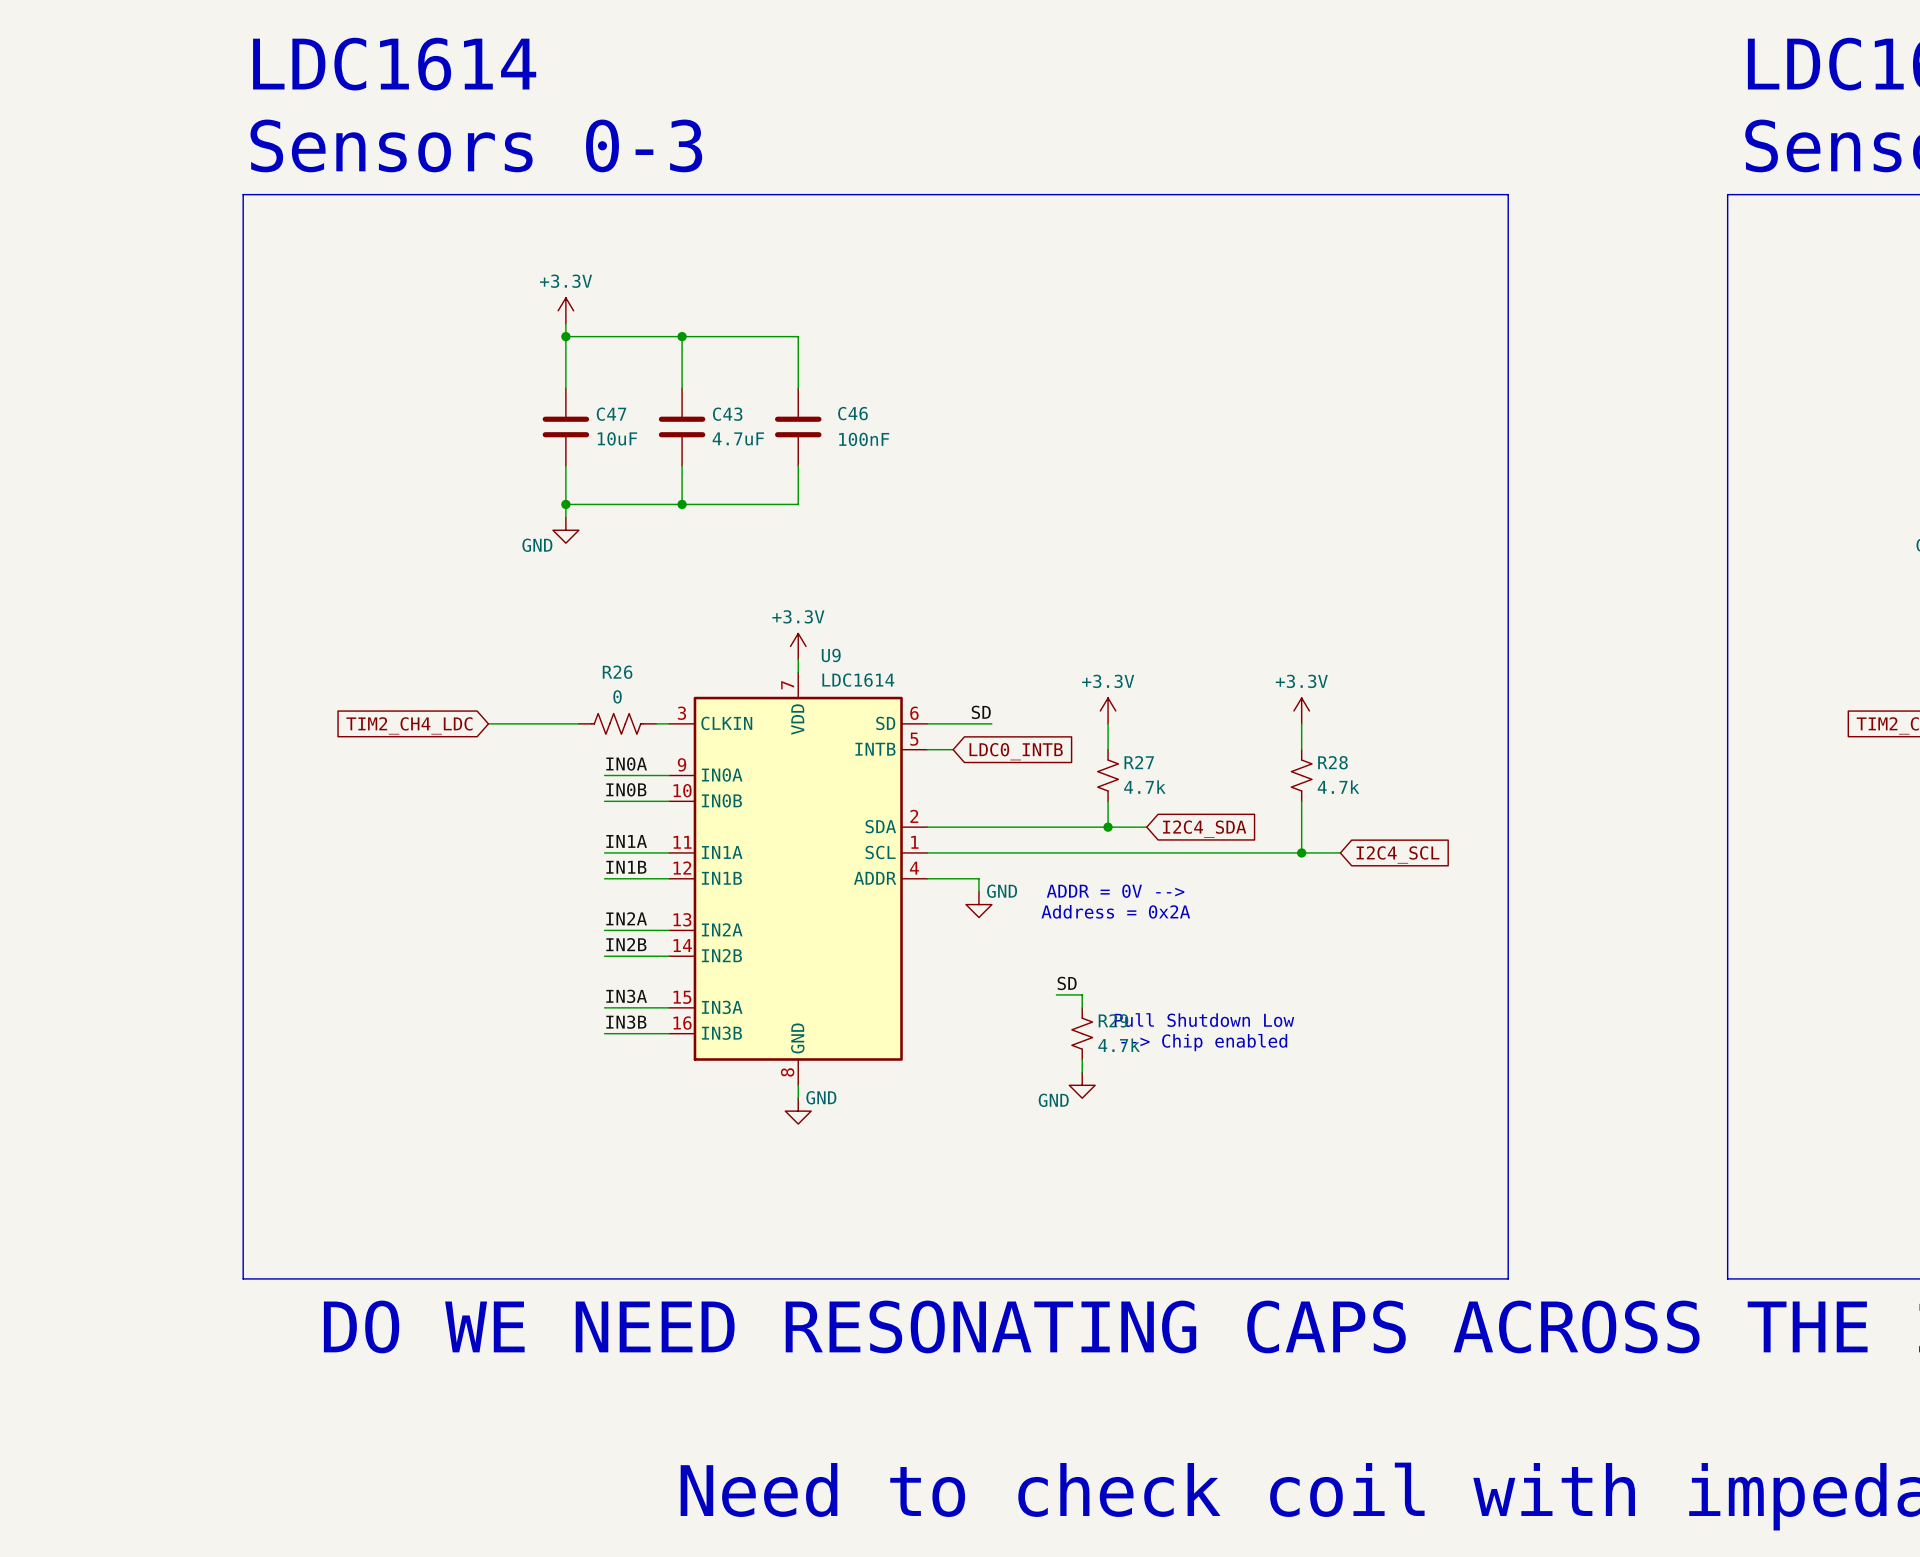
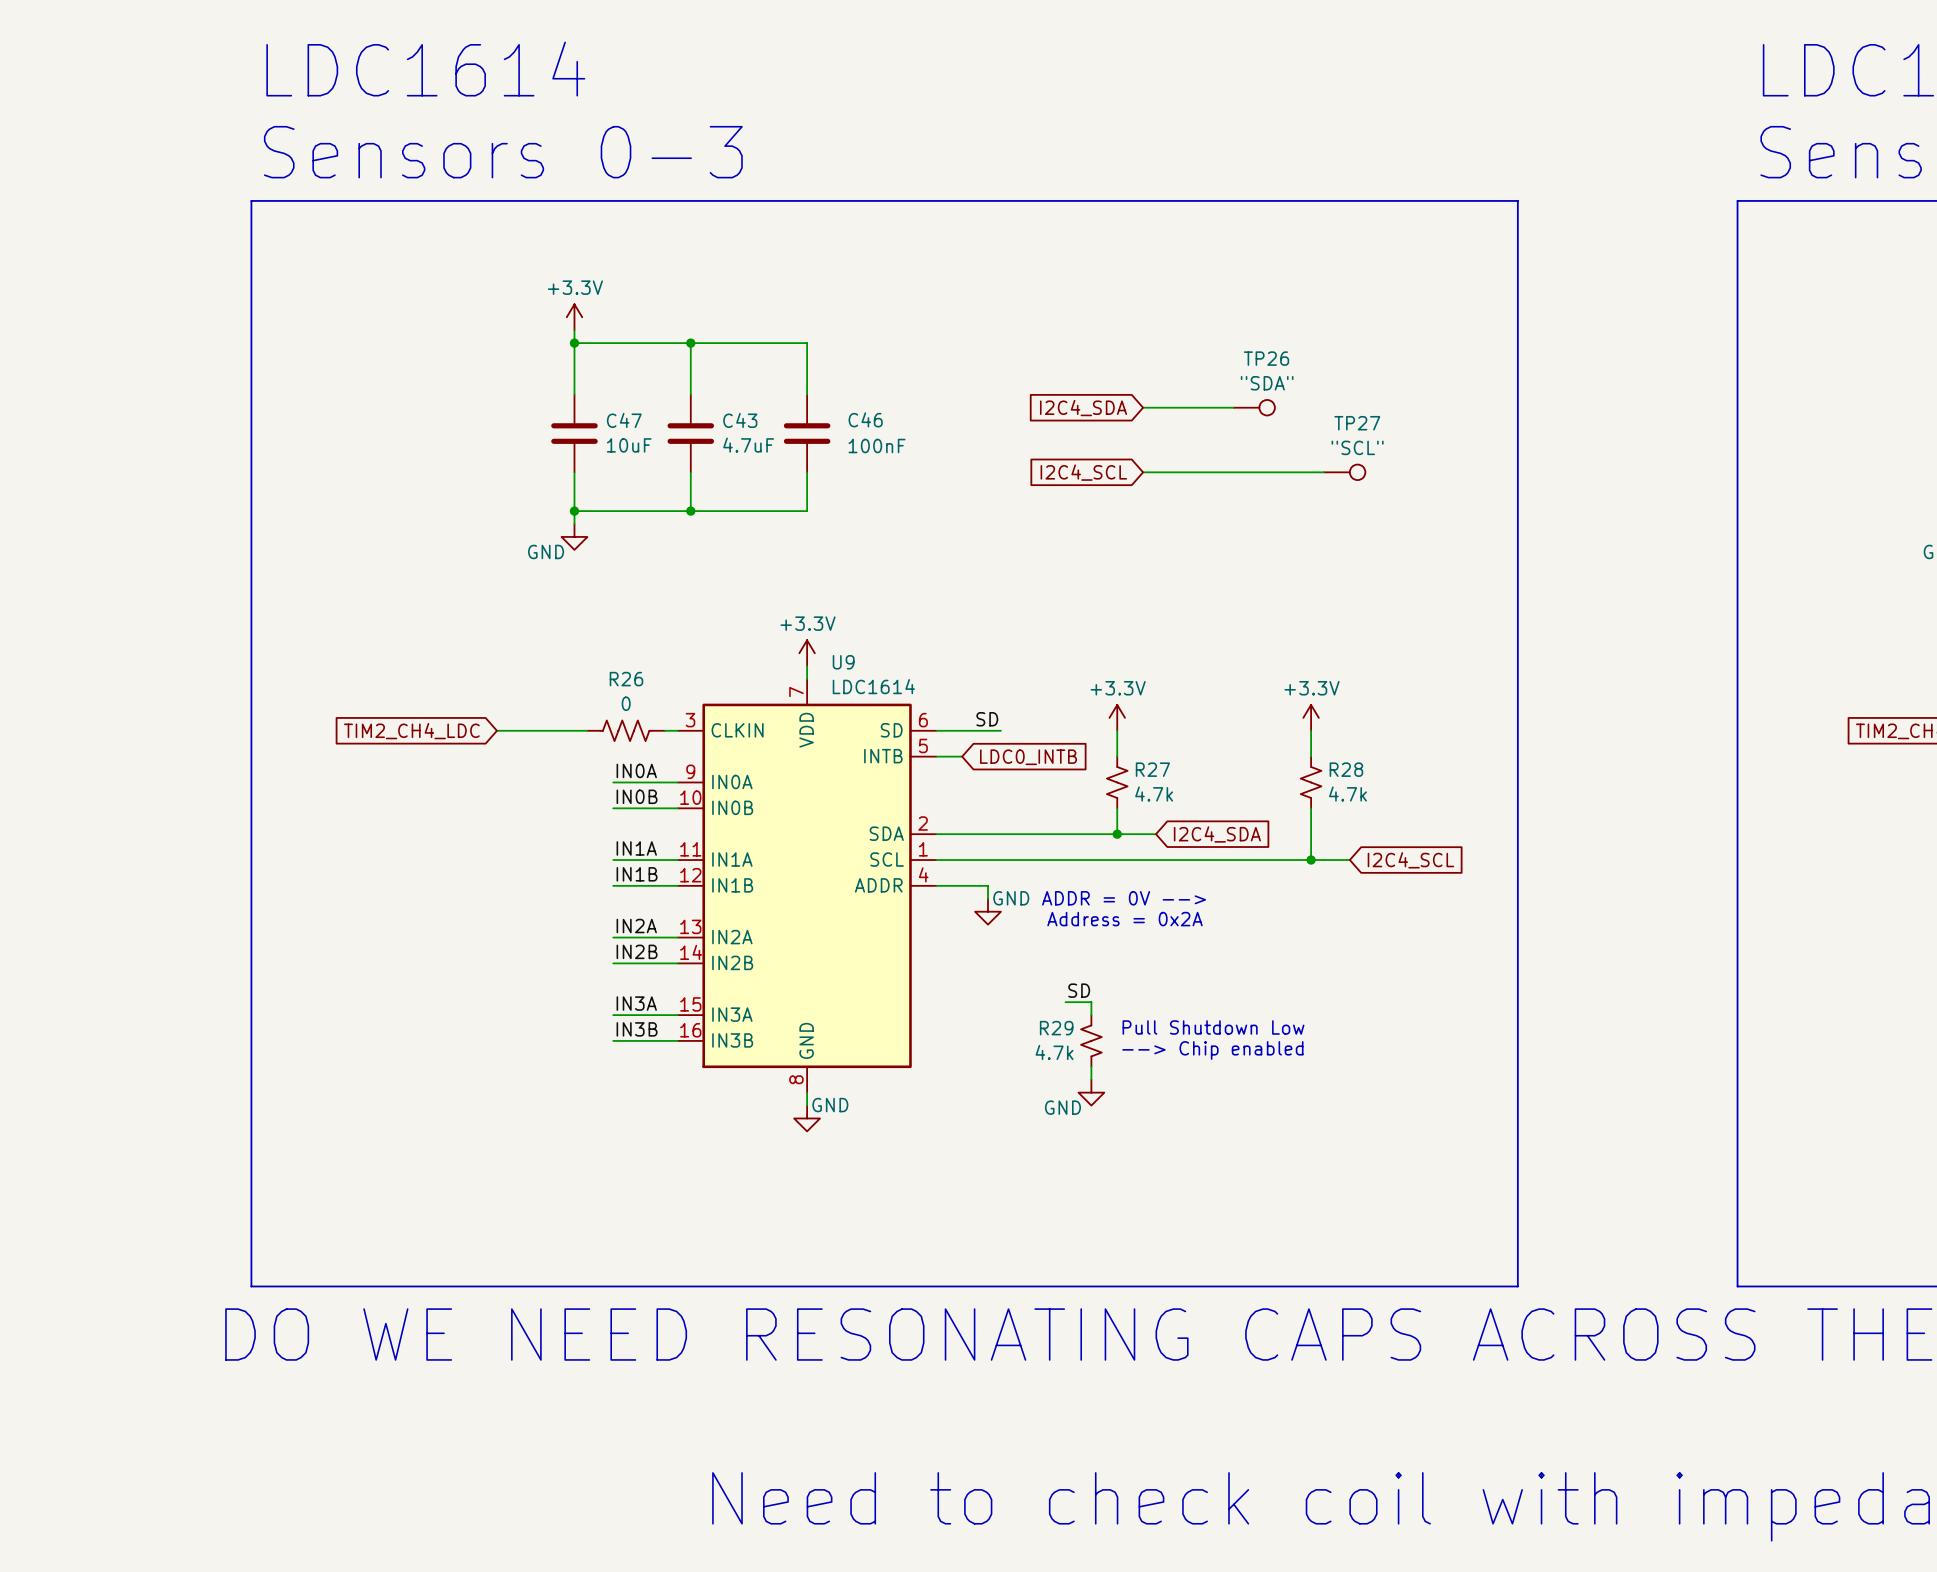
wire: none -> (1143, 407) (1233, 407)
TP26: none -> "SDA" (1254, 407)
global label: none -> I2C4_SDA (1083, 408)
wire: none -> (1143, 472) (1324, 472)
TP27: none -> "SCL" (1344, 472)
global label: none -> I2C4_SCL (1083, 472)
R29 flip: as is (1082, 1033) -> left-right (1091, 1040)

